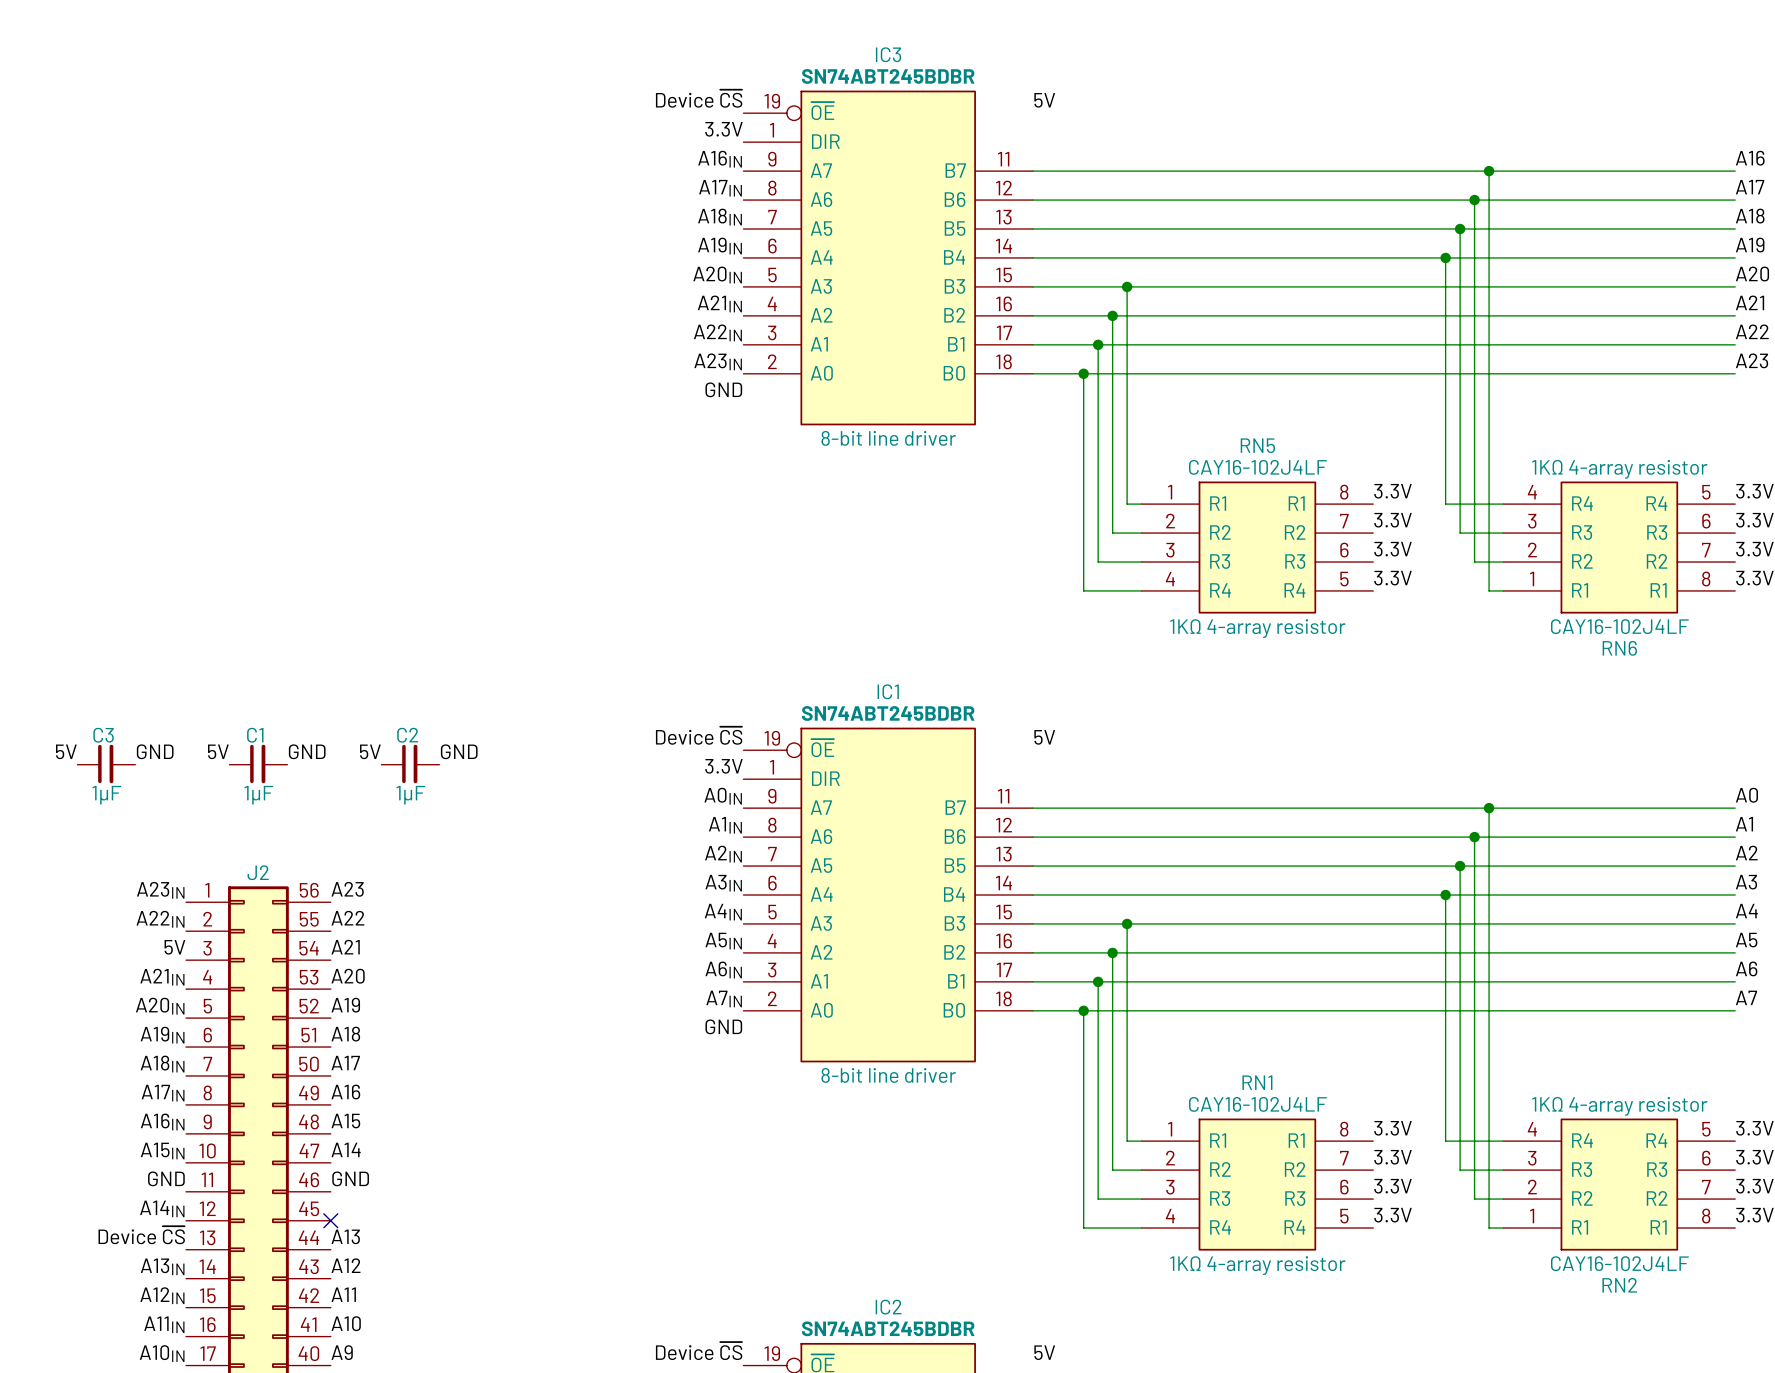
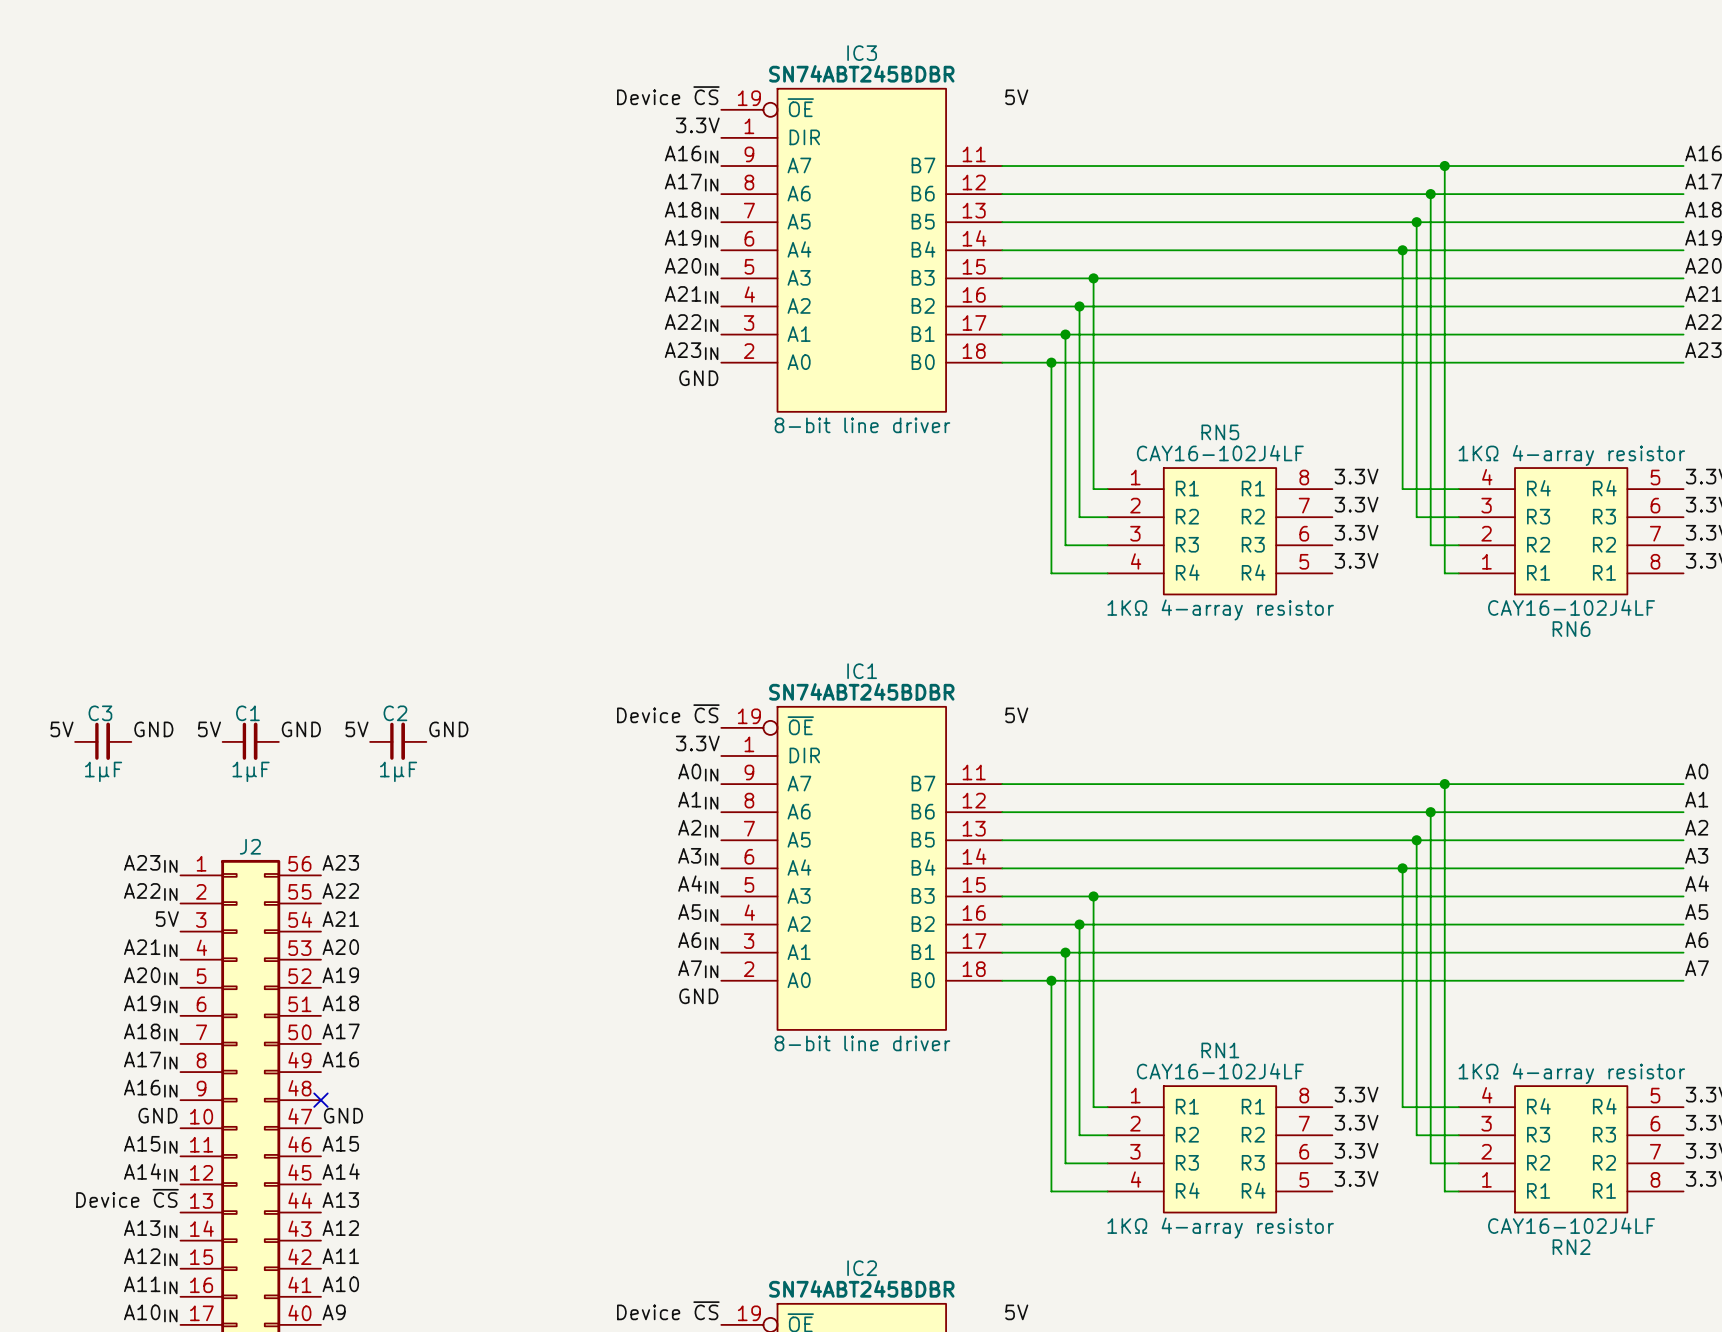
label: A15 (345, 1121) -> none
no-connect mark: none -> (320, 1100)
label: A14 (346, 1149) -> GND (343, 1115)
label: A15IN (162, 1151) -> GND (157, 1115)
label: GND (166, 1178) -> A15IN (150, 1144)
label: GND (350, 1178) -> A15 (340, 1143)
label: none -> A14 (341, 1171)
no-connect mark: (330, 1220) -> none

